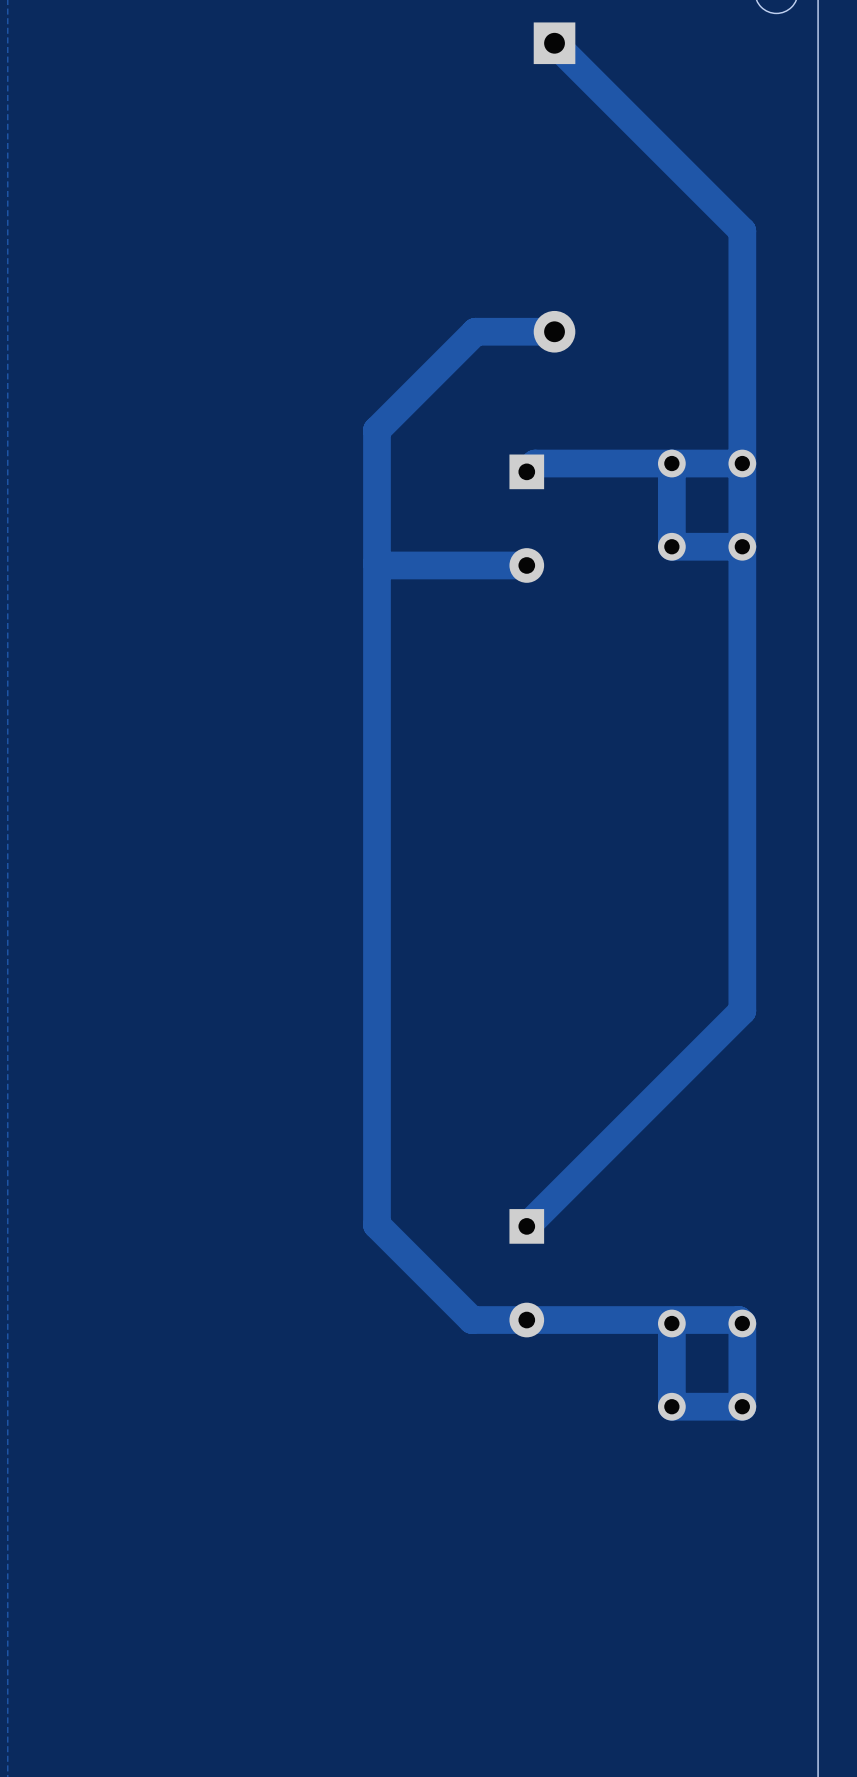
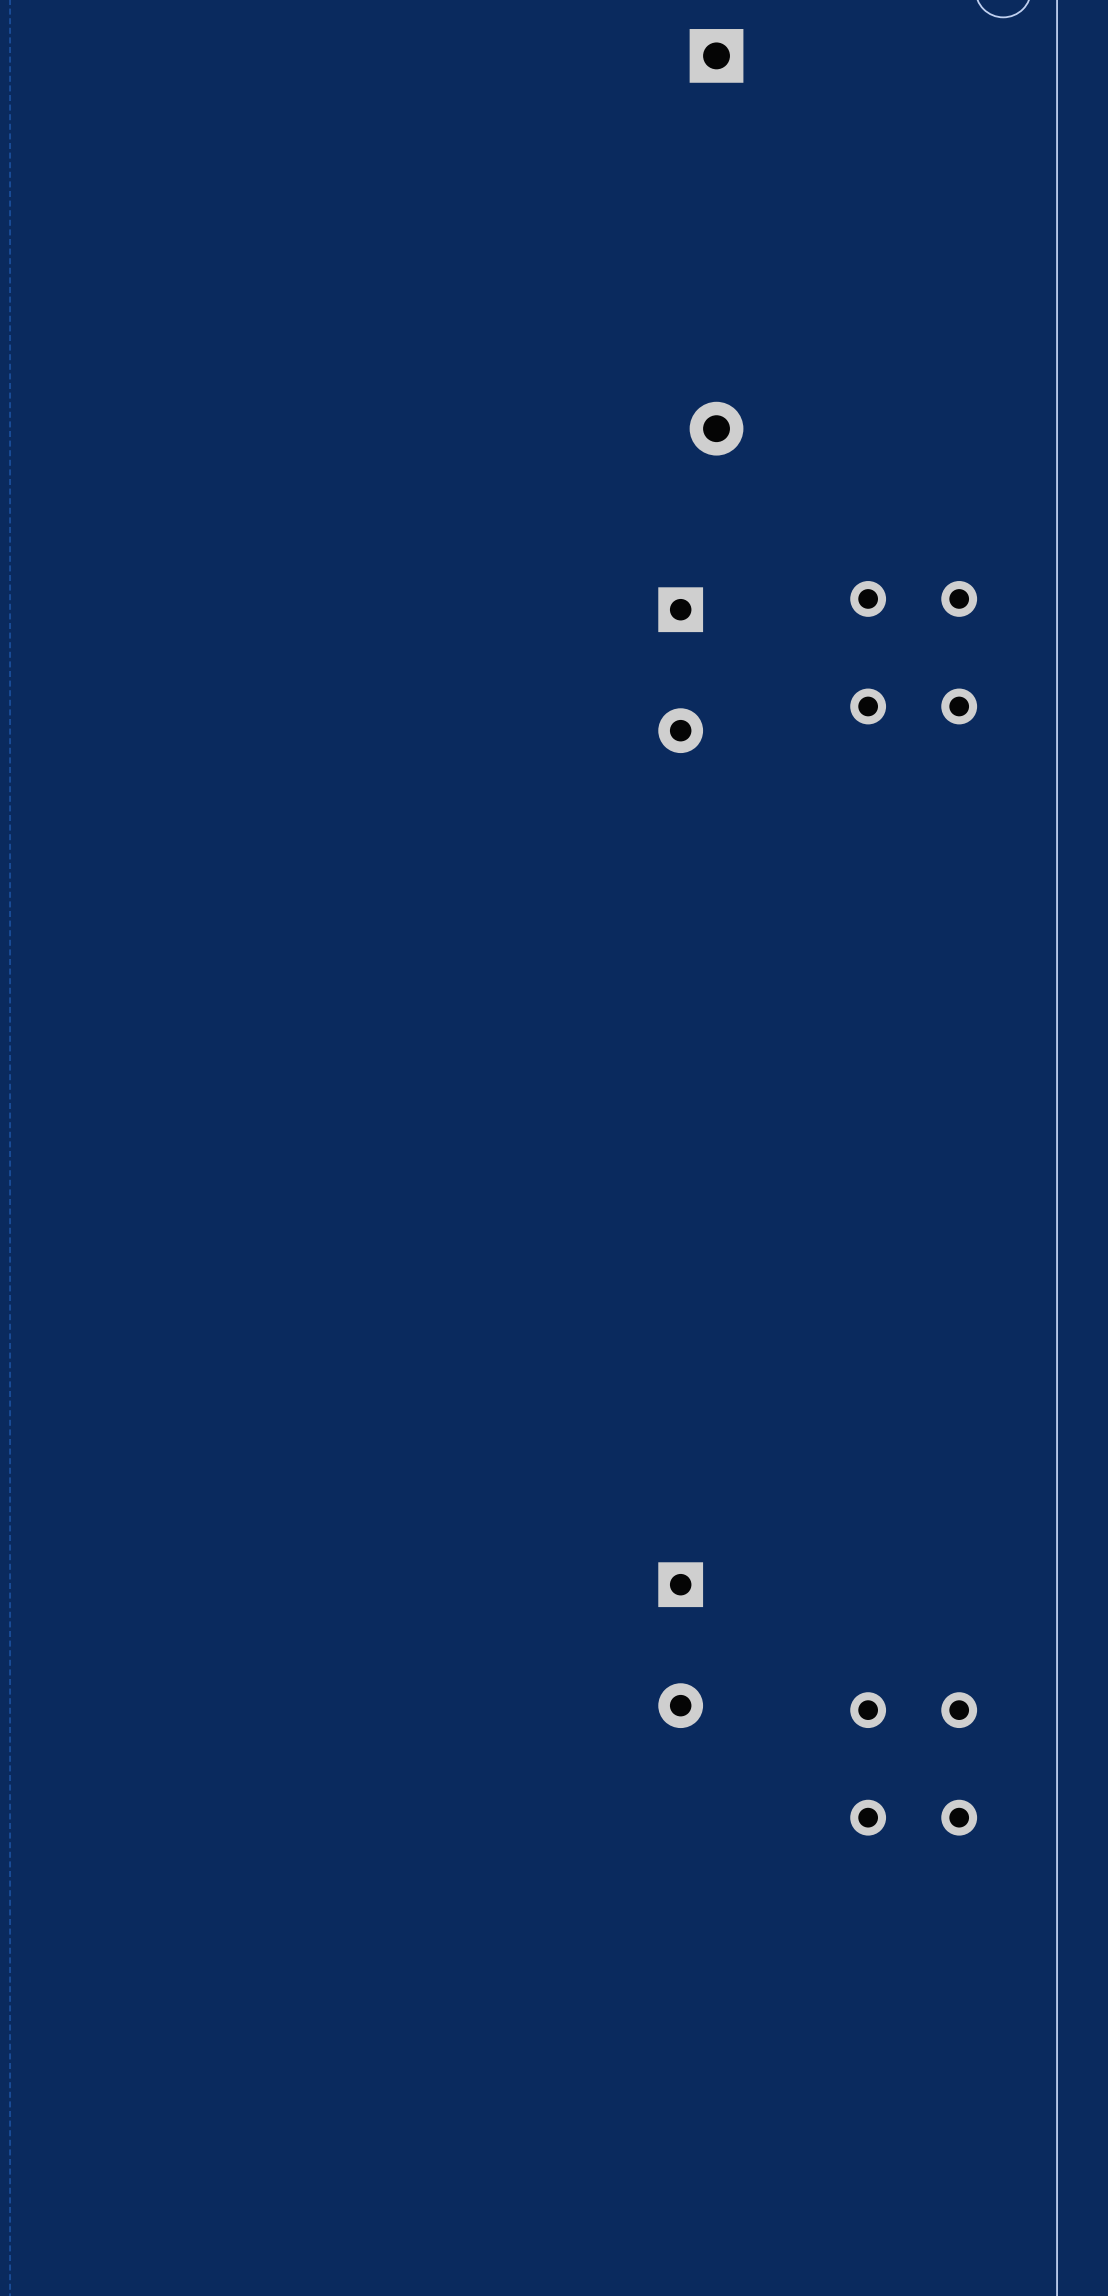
track: (554, 43) (742, 231) (742, 1010) (526, 1226) -> none
track: (554, 331) (475, 331) (376, 430) (376, 1225) (471, 1320) (738, 1320) (742, 1323) (742, 1406) (671, 1406) (671, 1323) -> none
track: (671, 463) (671, 546) (742, 546) -> none
track: (742, 463) (535, 463) (526, 471) -> none
track: (376, 563) (379, 565) (526, 565) -> none

